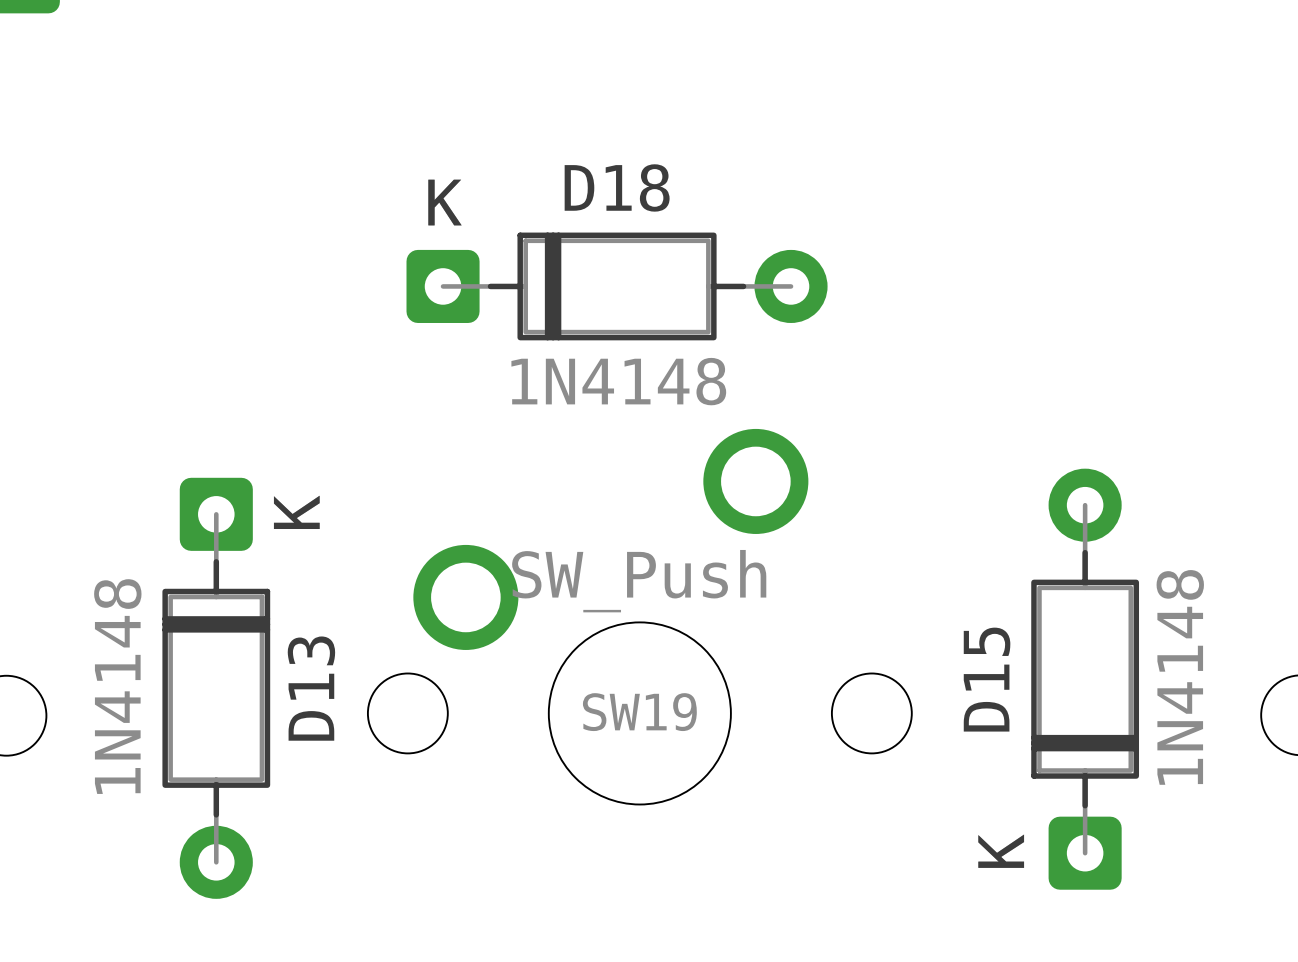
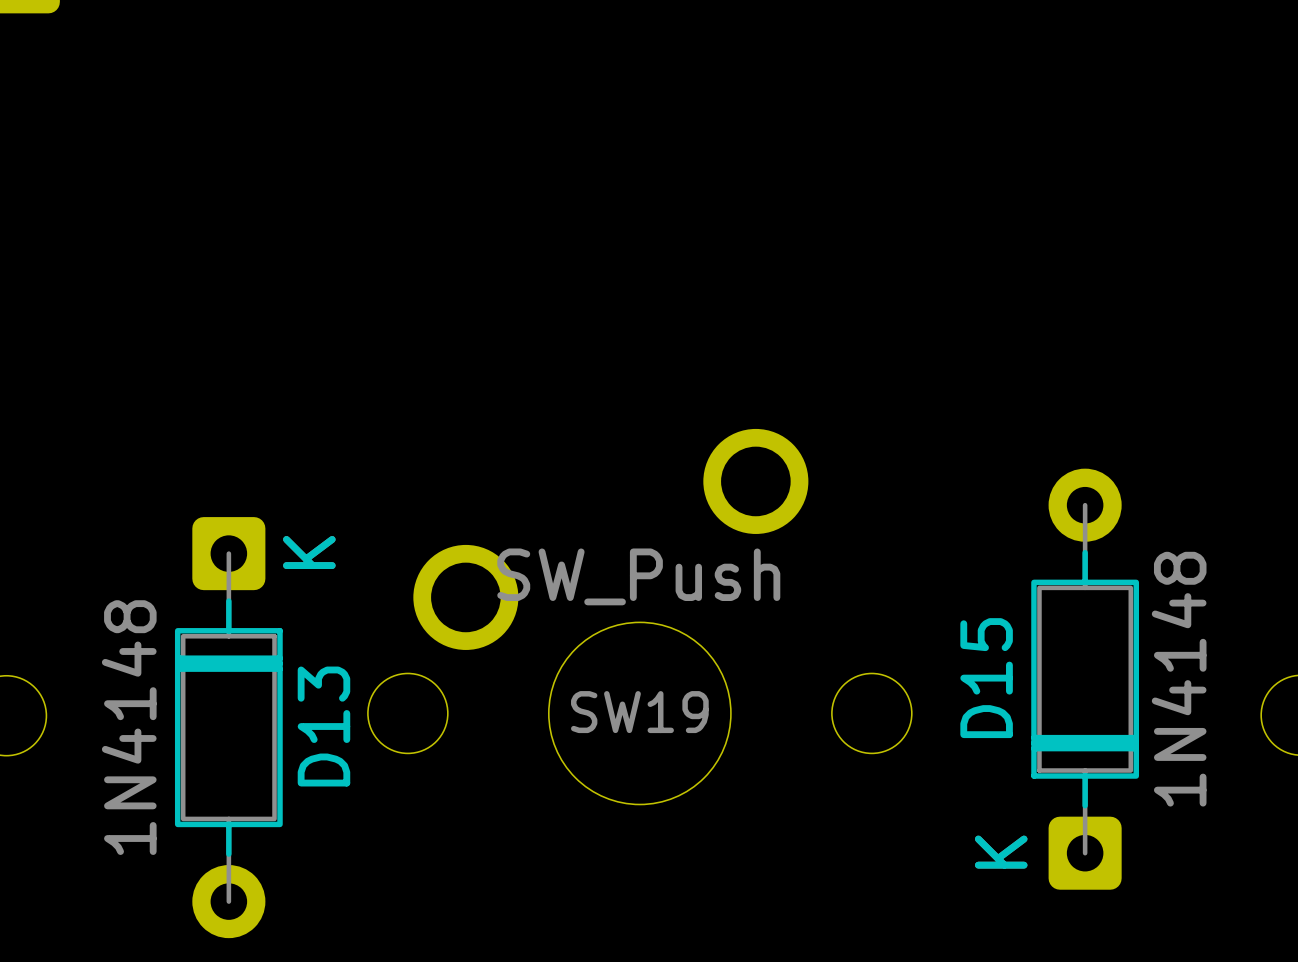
D18: 1N4148 (617, 286) -> none
D13 position: (216, 688) -> (228, 727)

